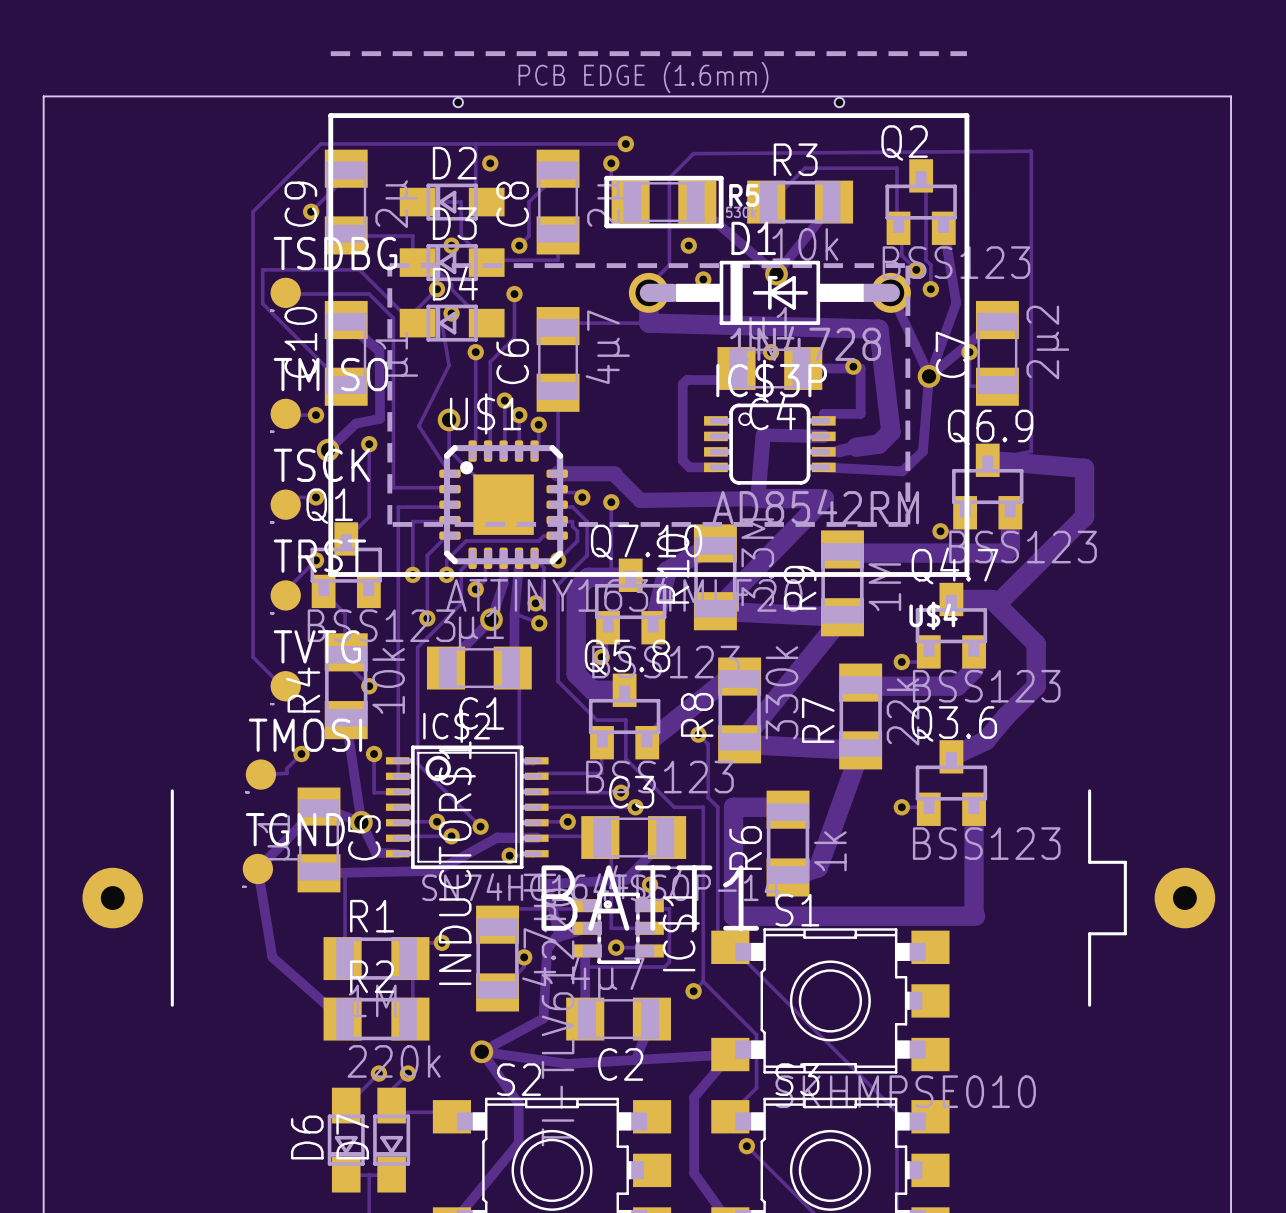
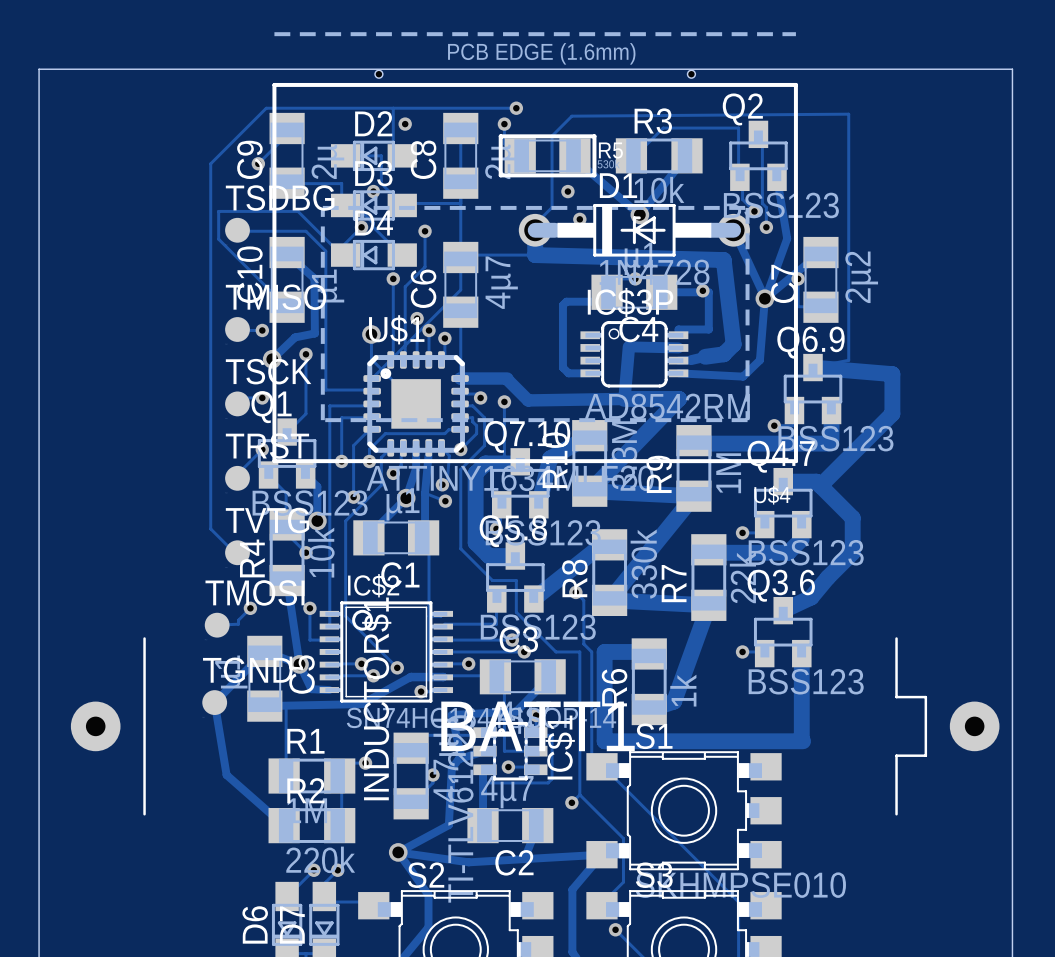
track: (558, 173) (529, 202) (529, 235) (519, 245) -> (460, 132) (460, 183)
via: (519, 245) -> none
track: none -> (460, 203) (460, 255)
track: (451, 313) (441, 323) (449, 365) (418, 426) (449, 473) (446, 473) -> none
via: (451, 313) -> none
track: none -> (460, 257) (460, 289) (372, 378)
track: none -> (305, 475) (317, 486) (317, 521)
via: none -> (317, 521)

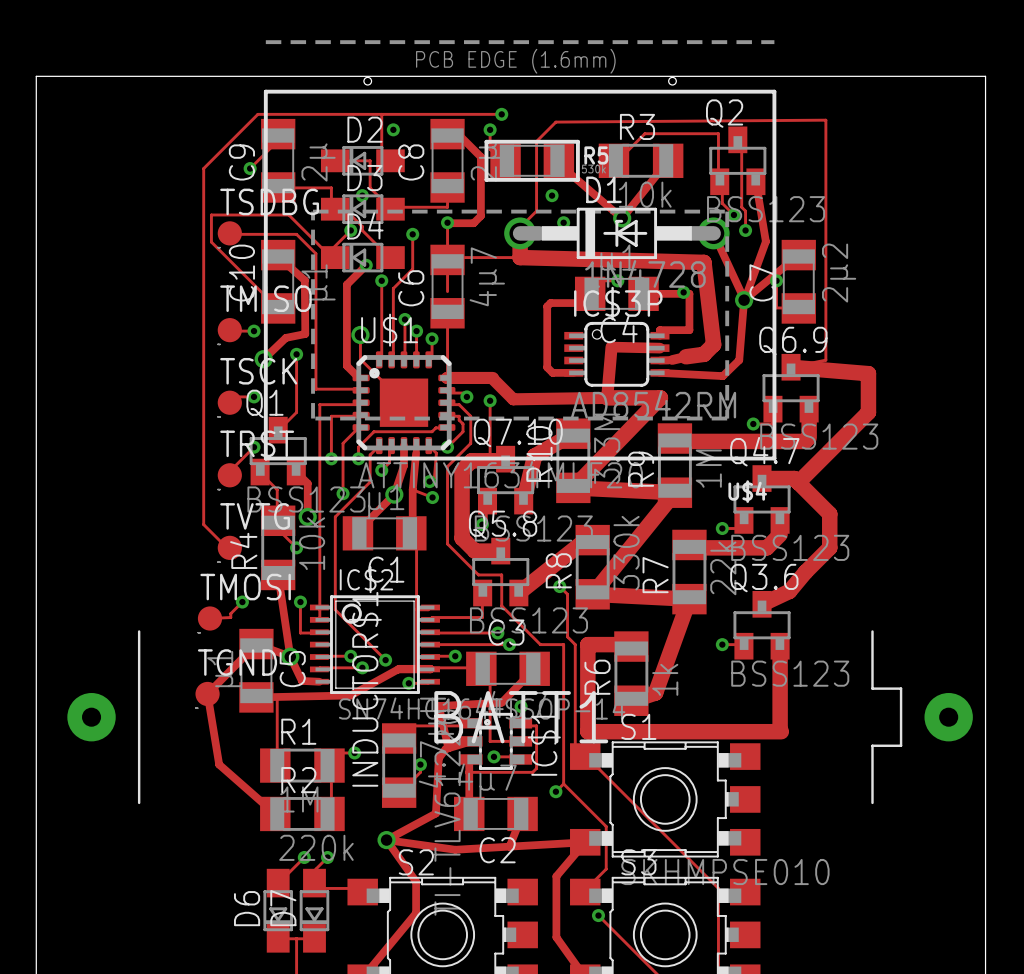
track: (460, 128) (460, 183) -> (447, 134) (458, 134) (480, 156) (480, 215) (473, 223) (447, 222)
track: (460, 203) (460, 219) -> none
via: none -> (447, 222)
via: none -> (366, 265)
track: (460, 289) (372, 378) -> (366, 265) (346, 284) (346, 365) (361, 377)

